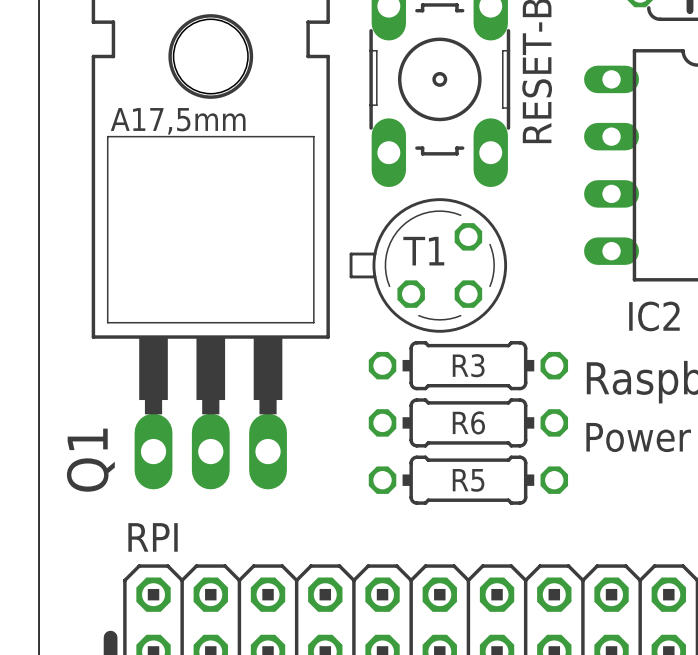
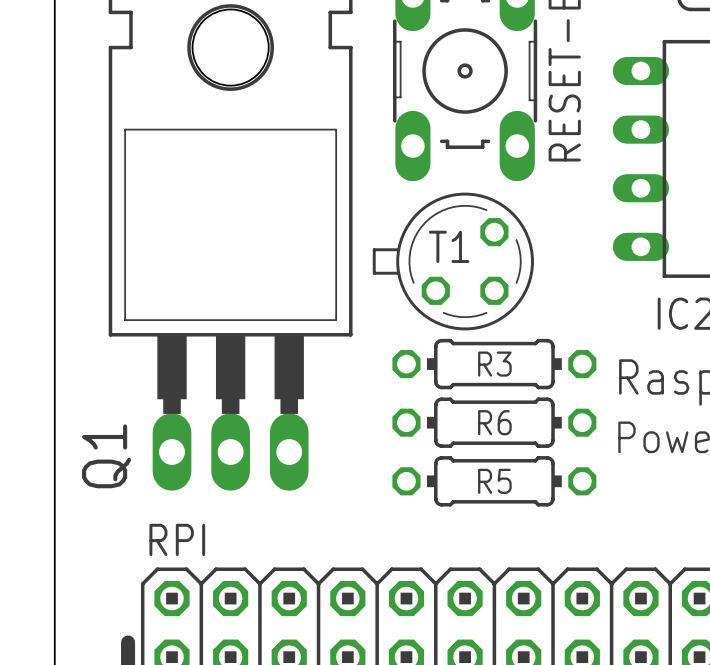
Q1 text: A17,5mm (178, 121) -> none

